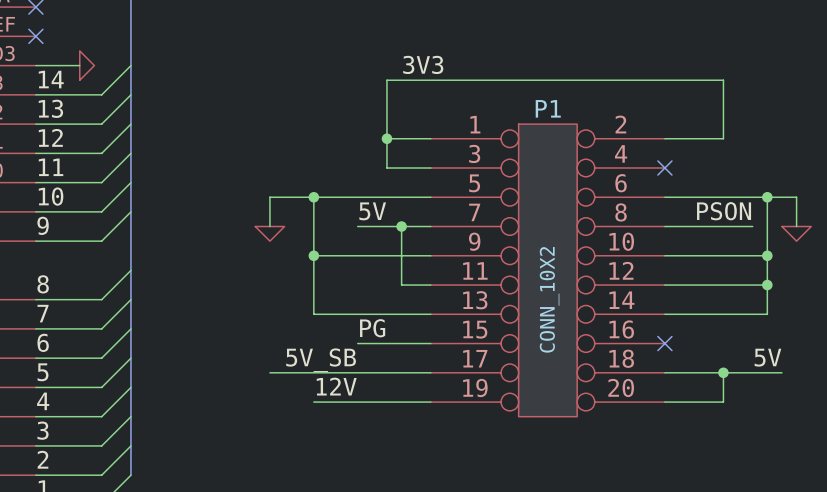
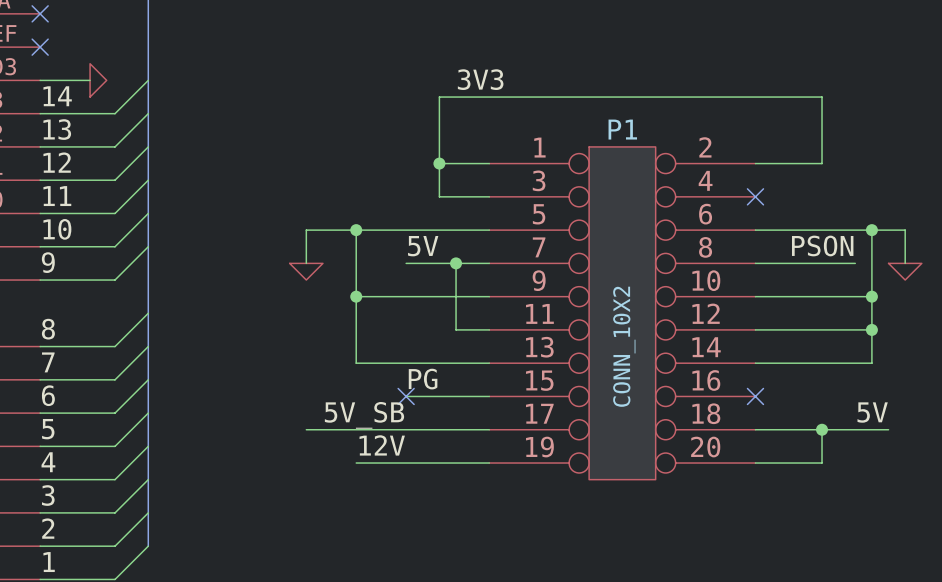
no-connect mark: none -> (406, 396)

